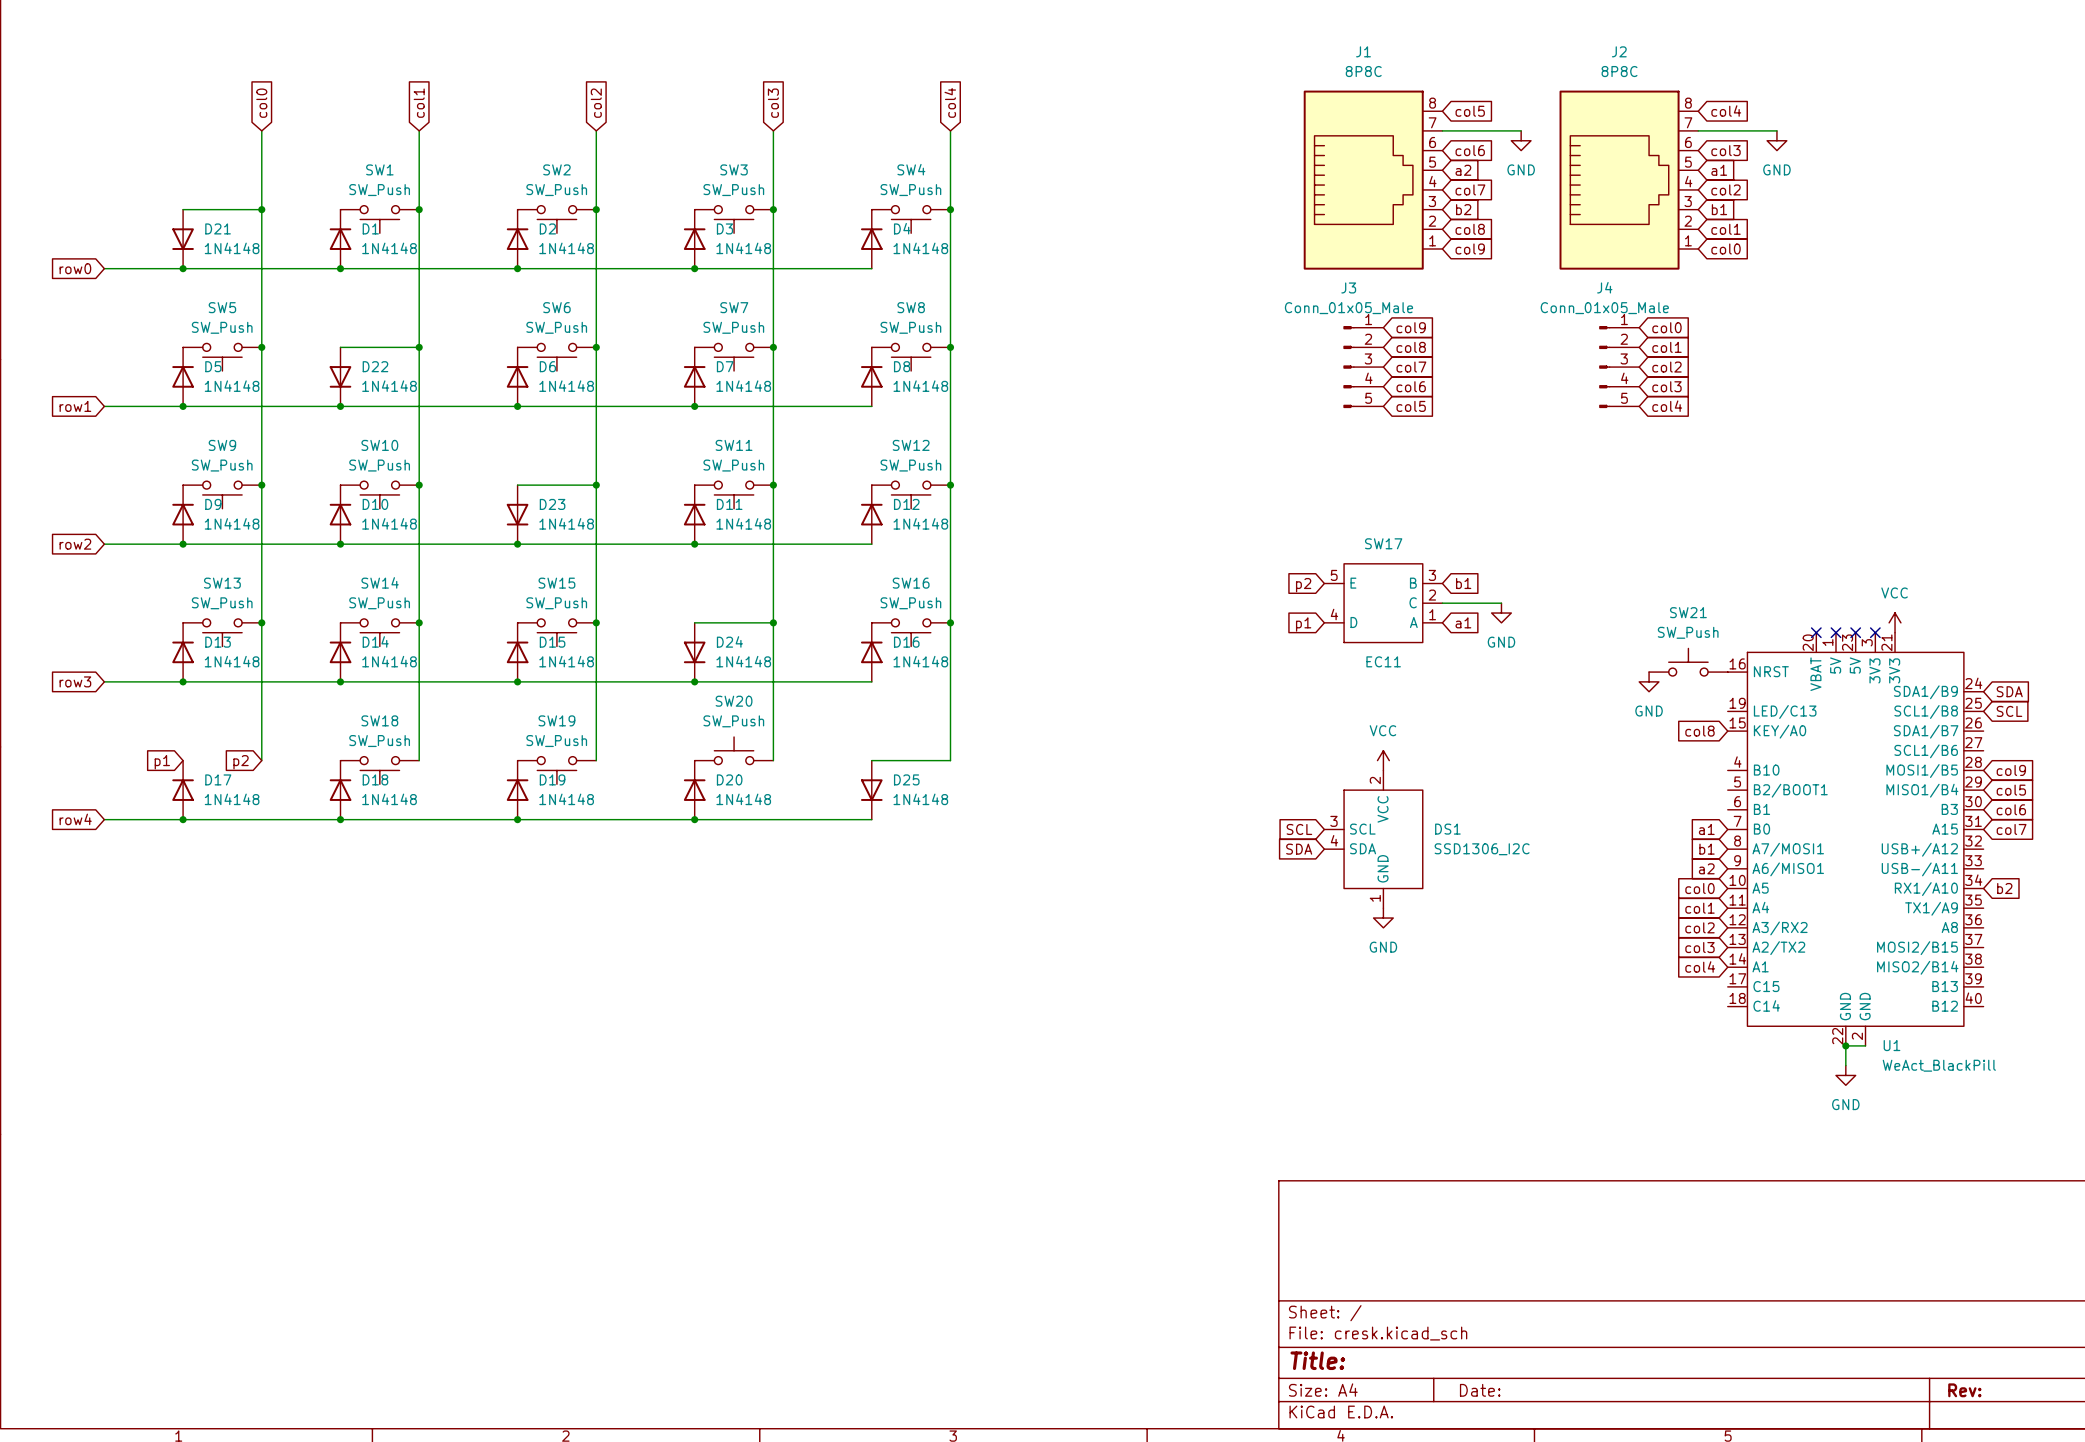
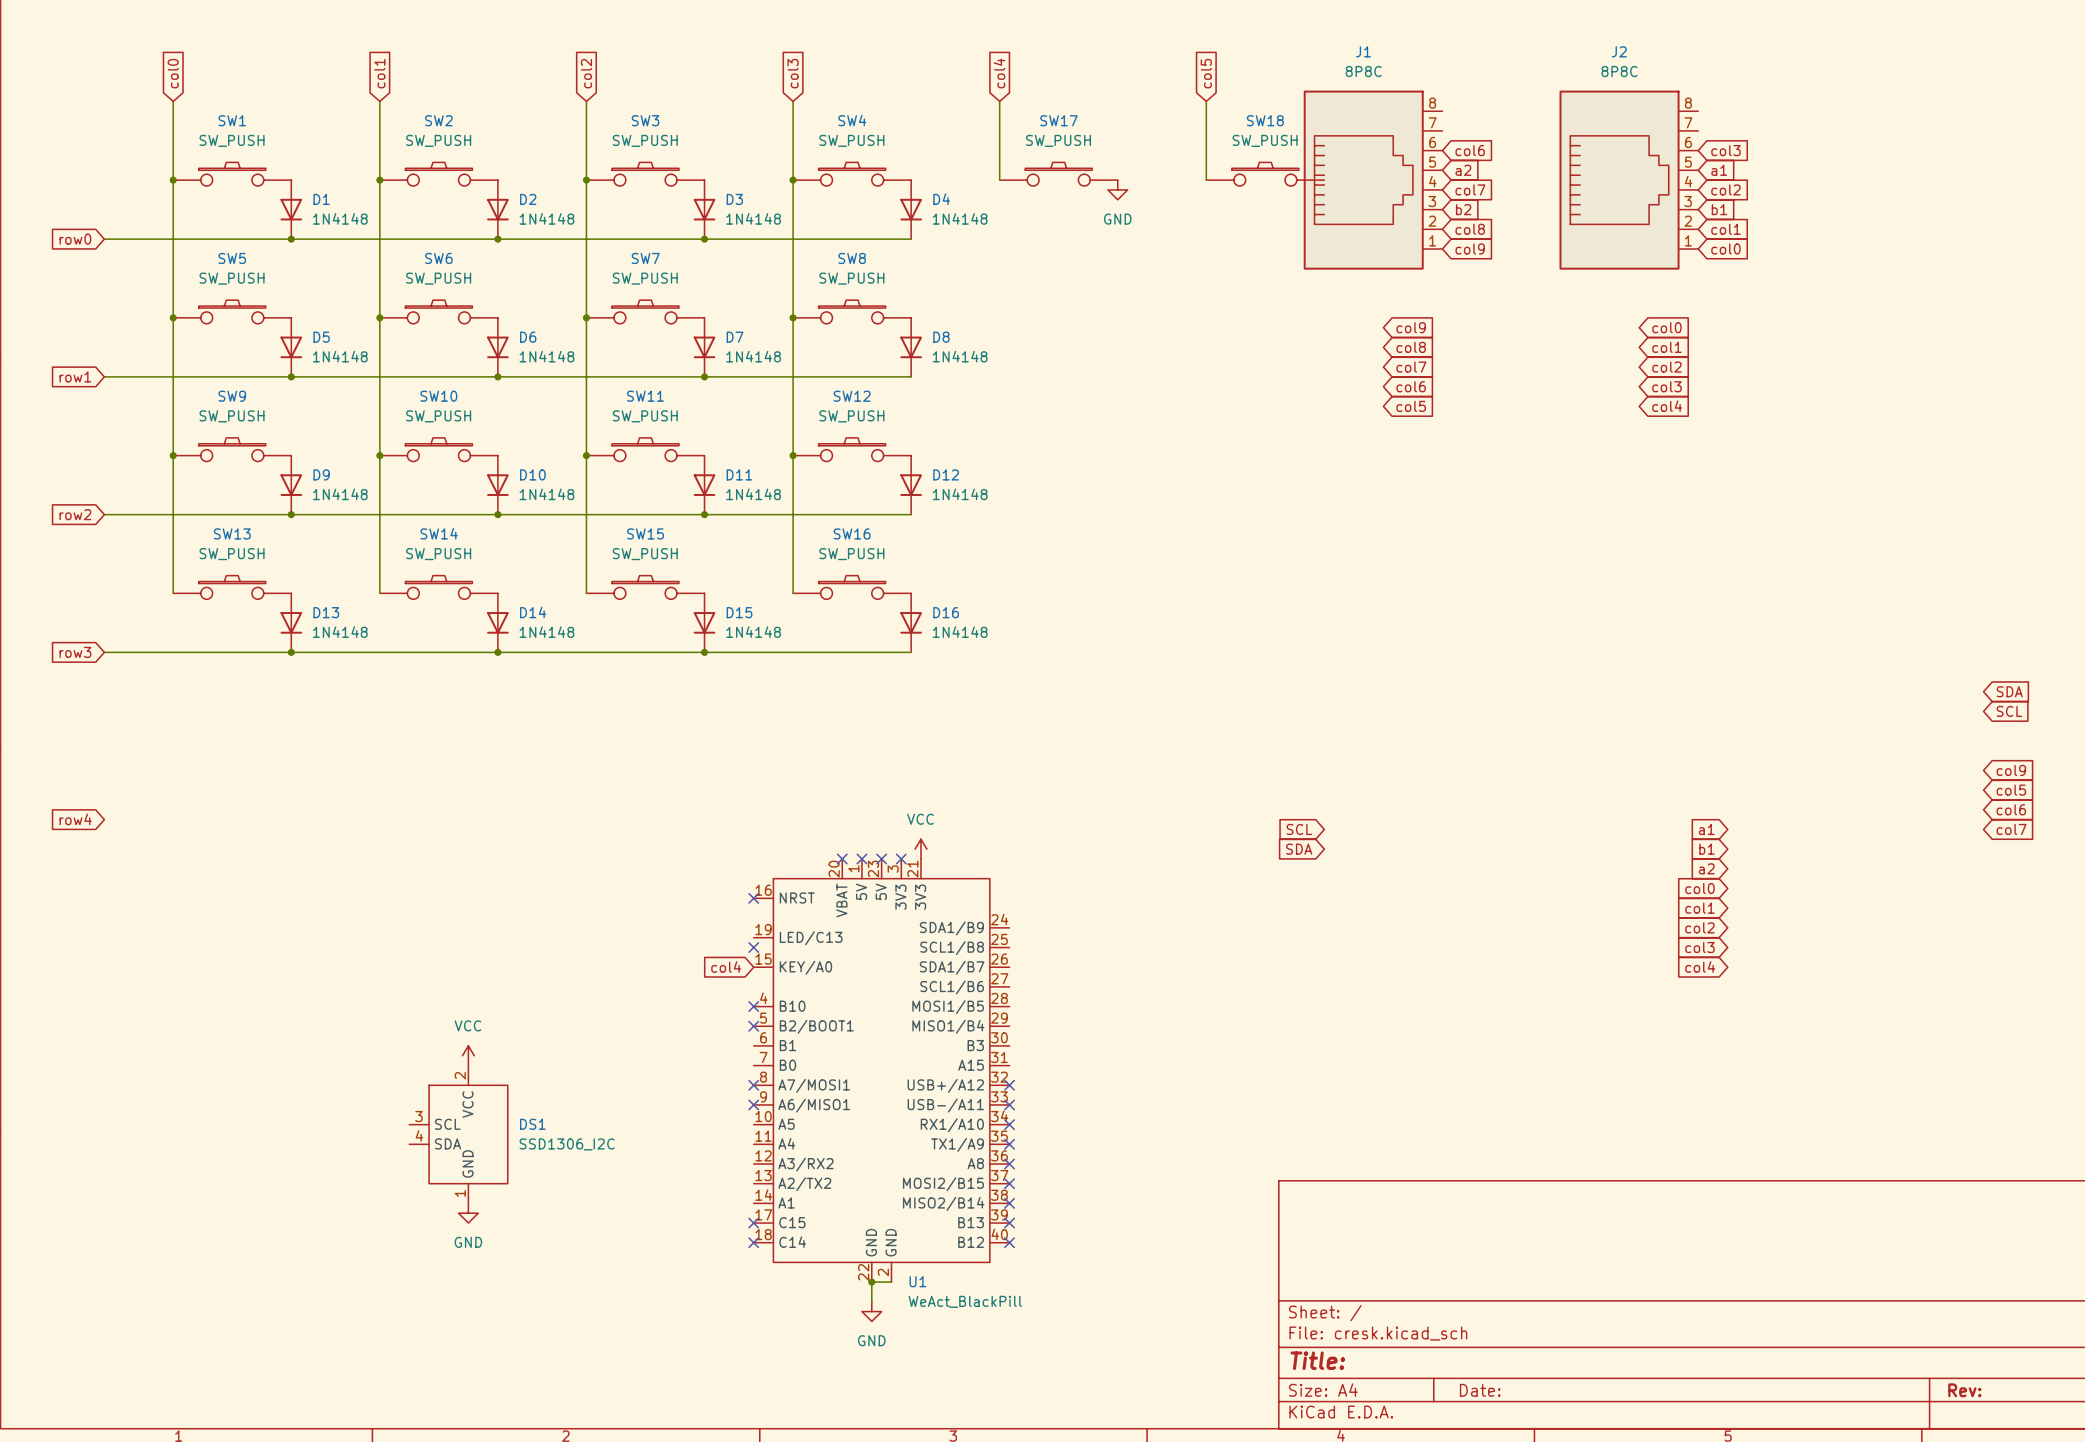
global label: none -> col5 (1206, 73)
wire: none -> (173, 101) (173, 593)
wire: none -> (379, 101) (379, 593)
wire: none -> (586, 101) (586, 593)
wire: none -> (793, 101) (793, 593)
wire: none -> (999, 101) (999, 180)
wire: none -> (1206, 101) (1206, 180)
global label position: col4 (950, 102) -> col4 (999, 73)
global label position: col0 (261, 103) -> col0 (173, 73)
global label position: col1 (419, 103) -> col1 (379, 73)
global label position: col2 (596, 103) -> col2 (586, 73)
global label position: col3 (773, 103) -> col3 (793, 73)
global label: col5 (1470, 111) -> none
global label: col4 (1726, 111) -> none
wire: (261, 130) (261, 760) -> none
wire: (419, 130) (419, 760) -> none
wire: (596, 130) (596, 760) -> none
wire: (773, 130) (773, 760) -> none
wire: (950, 130) (950, 760) (871, 760) -> none
wire: (1442, 130) (1521, 130) -> none
wire: (1698, 130) (1776, 130) -> none
power symbol: GND (1521, 140) -> none
power symbol: GND (1776, 140) -> none
junction: none -> (173, 180)
junction: none -> (379, 180)
power symbol: none -> GND (1117, 189)
SW1 value: SW_Push (379, 190) -> SW_PUSH (232, 140)
SW2 value: SW_Push (556, 190) -> SW_PUSH (438, 140)
SW3 value: SW_Push (733, 190) -> SW_PUSH (645, 140)
SW4 value: SW_Push (910, 190) -> SW_PUSH (851, 140)
SW1 symbol: [340, 205, 420, 234] -> [173, 162, 292, 187]
SW2 symbol: [517, 205, 597, 234] -> [379, 162, 498, 187]
SW3 symbol: [694, 205, 774, 234] -> [586, 162, 705, 187]
SW4 symbol: [871, 205, 951, 234] -> [793, 162, 912, 187]
wire: (183, 209) (261, 209) -> none
junction: (261, 209) -> none
junction: (419, 209) -> none
junction position: (596, 209) -> (586, 180)
junction position: (773, 209) -> (793, 180)
junction: (950, 209) -> none
wire: none -> (104, 239) (911, 239)
D21: 1N4148 (183, 239) -> none
junction: none -> (291, 239)
D1 rotation: 0° (340, 239) -> 180° (291, 209)
D1 position: (340, 239) -> (291, 209)
D2 rotation: 0° (517, 239) -> 180° (497, 209)
D2 position: (517, 239) -> (497, 209)
D3 rotation: 0° (694, 239) -> 180° (704, 209)
D4 rotation: 0° (871, 239) -> 180° (911, 209)
D4 position: (871, 239) -> (911, 209)
global label position: row0 (75, 268) -> row0 (75, 239)
wire: (104, 268) (871, 268) -> none
junction: (183, 268) -> none
junction: (340, 268) -> none
junction position: (517, 268) -> (497, 239)
junction position: (694, 268) -> (704, 239)
junction: none -> (173, 317)
junction: none -> (379, 317)
SW5 value: SW_Push (222, 327) -> SW_PUSH (232, 278)
SW6 value: SW_Push (556, 327) -> SW_PUSH (438, 278)
SW7 value: SW_Push (733, 327) -> SW_PUSH (645, 278)
SW8 value: SW_Push (910, 327) -> SW_PUSH (851, 278)
SW5 symbol: [183, 343, 262, 371] -> [173, 300, 292, 324]
SW6 symbol: [517, 343, 597, 371] -> [379, 300, 498, 324]
SW7 symbol: [694, 343, 774, 371] -> [586, 300, 705, 324]
SW8 symbol: [871, 343, 951, 371] -> [793, 300, 912, 324]
junction: (261, 347) -> none
wire: (340, 347) (419, 347) -> none
junction: (419, 347) -> none
junction position: (596, 347) -> (586, 317)
junction position: (773, 347) -> (793, 317)
junction: (950, 347) -> none
J3: Conn_01x05_Male (1363, 367) -> none
J4: Conn_01x05_Male (1619, 367) -> none
wire: none -> (104, 376) (911, 376)
D5 rotation: 0° (183, 376) -> 180° (291, 347)
D5 position: (183, 376) -> (291, 347)
junction: none -> (291, 376)
D22: 1N4148 (340, 376) -> none
D6 rotation: 0° (517, 376) -> 180° (497, 347)
D6 position: (517, 376) -> (497, 347)
D7 rotation: 0° (694, 376) -> 180° (704, 347)
D8 rotation: 0° (871, 376) -> 180° (911, 347)
D8 position: (871, 376) -> (911, 347)
global label position: row1 (75, 406) -> row1 (75, 376)
wire: (104, 406) (871, 406) -> none
junction: (183, 406) -> none
junction: (340, 406) -> none
junction position: (517, 406) -> (497, 376)
junction position: (694, 406) -> (704, 376)
junction: none -> (173, 455)
junction: none -> (379, 455)
SW9 value: SW_Push (222, 465) -> SW_PUSH (232, 416)
SW10 value: SW_Push (379, 465) -> SW_PUSH (438, 416)
SW11 value: SW_Push (733, 465) -> SW_PUSH (645, 416)
SW12 value: SW_Push (910, 465) -> SW_PUSH (851, 416)
SW9 symbol: [183, 481, 262, 509] -> [173, 437, 292, 462]
SW10 symbol: [340, 481, 420, 509] -> [379, 437, 498, 462]
SW11 symbol: [694, 481, 774, 509] -> [586, 437, 705, 462]
SW12 symbol: [871, 481, 951, 509] -> [793, 437, 912, 462]
junction: (261, 485) -> none
junction: (419, 485) -> none
wire: (517, 485) (596, 485) -> none
junction position: (596, 485) -> (586, 455)
junction position: (773, 485) -> (793, 455)
junction: (950, 485) -> none
wire: none -> (104, 514) (911, 514)
D9 rotation: 0° (183, 514) -> 180° (291, 485)
D9 position: (183, 514) -> (291, 485)
junction: none -> (291, 514)
D10 rotation: 0° (340, 514) -> 180° (497, 485)
D10 position: (340, 514) -> (497, 485)
D23: 1N4148 (517, 514) -> none
D11 rotation: 0° (694, 514) -> 180° (704, 485)
D12 rotation: 0° (871, 514) -> 180° (911, 485)
D12 position: (871, 514) -> (911, 485)
global label position: row2 (75, 544) -> row2 (75, 514)
wire: (104, 544) (871, 544) -> none
junction: (183, 544) -> none
junction: (340, 544) -> none
junction position: (517, 544) -> (497, 514)
junction position: (694, 544) -> (704, 514)
SW17 symbol: [1324, 563, 1443, 643] -> [999, 162, 1118, 187]
global label: b1 (1463, 583) -> none
global label: p2 (1303, 585) -> none
SW13 value: SW_Push (222, 603) -> SW_PUSH (232, 554)
SW14 value: SW_Push (379, 603) -> SW_PUSH (438, 554)
SW15 value: SW_Push (556, 603) -> SW_PUSH (645, 554)
SW16 value: SW_Push (910, 603) -> SW_PUSH (851, 554)
wire: (1442, 603) (1501, 603) -> none
power symbol: GND (1501, 613) -> none
SW13 symbol: [183, 618, 262, 647] -> [173, 575, 292, 600]
SW14 symbol: [340, 618, 420, 647] -> [379, 575, 498, 600]
SW15 symbol: [517, 618, 597, 647] -> [586, 575, 705, 600]
SW16 symbol: [871, 618, 951, 647] -> [793, 575, 912, 600]
junction: (261, 622) -> none
junction: (419, 622) -> none
junction: (596, 622) -> none
wire: (694, 622) (773, 622) -> none
junction: (773, 622) -> none
junction: (950, 622) -> none
global label: a1 (1463, 622) -> none
power symbol: VCC (1895, 622) -> none
global label: p1 (1303, 624) -> none
U1 symbol: [1727, 632, 1984, 1046] -> [753, 858, 1010, 1283]
no-connect mark: (1816, 632) -> none
no-connect mark: (1835, 632) -> none
no-connect mark: (1855, 632) -> none
no-connect mark: (1875, 632) -> none
wire: none -> (104, 652) (911, 652)
D13 rotation: 0° (183, 652) -> 180° (291, 622)
D13 position: (183, 652) -> (291, 622)
junction: none -> (291, 652)
D14 rotation: 0° (340, 652) -> 180° (497, 622)
D14 position: (340, 652) -> (497, 622)
D15 rotation: 0° (517, 652) -> 180° (704, 622)
D15 position: (517, 652) -> (704, 622)
D24: 1N4148 (694, 652) -> none
D16 rotation: 0° (871, 652) -> 180° (911, 622)
D16 position: (871, 652) -> (911, 622)
SW17 value: EC11 (1383, 661) -> SW_PUSH (1058, 140)
SW21: SW_Push (1688, 662) -> none
global label position: row3 (75, 681) -> row3 (75, 652)
wire: (104, 681) (871, 681) -> none
junction: (183, 681) -> none
junction: (340, 681) -> none
junction position: (517, 681) -> (497, 652)
junction position: (694, 681) -> (704, 652)
power symbol: GND (1649, 681) -> none
global label: col8 (1699, 731) -> none
SW18 value: SW_Push (379, 741) -> SW_PUSH (1265, 140)
SW20: SW_Push (734, 750) -> none
SW18 symbol: [340, 756, 420, 785] -> [1206, 162, 1325, 187]
power symbol: VCC (1383, 760) -> none
global label: p1 (162, 762) -> none
global label: p2 (241, 762) -> none
SW19: SW_Push (556, 770) -> none
D17: 1N4148 (183, 790) -> none
D18: 1N4148 (340, 790) -> none
D19: 1N4148 (517, 790) -> none
D20: 1N4148 (694, 790) -> none
D25: 1N4148 (871, 790) -> none
wire: (104, 819) (871, 819) -> none
junction: (183, 819) -> none
junction: (340, 819) -> none
junction: (517, 819) -> none
junction: (694, 819) -> none
DS1 position: (1373, 839) -> (458, 1134)
power symbol: none -> VCC (920, 849)
no-connect mark: none -> (842, 858)
no-connect mark: none -> (861, 858)
no-connect mark: none -> (881, 858)
no-connect mark: none -> (901, 858)
global label: b2 (2004, 888) -> none
no-connect mark: none -> (753, 898)
power symbol: GND (1383, 918) -> none
no-connect mark: none -> (753, 947)
global label: none -> col4 (726, 966)
no-connect mark: none -> (753, 1006)
no-connect mark: none -> (753, 1026)
junction: (1845, 1045) -> none
wire: (1865, 1045) (1845, 1045) (1845, 1065) -> none
power symbol: none -> VCC (468, 1055)
power symbol: GND (1845, 1075) -> none
no-connect mark: none -> (753, 1085)
no-connect mark: none -> (1009, 1085)
no-connect mark: none -> (753, 1104)
no-connect mark: none -> (1009, 1104)
no-connect mark: none -> (1009, 1124)
no-connect mark: none -> (1009, 1144)
no-connect mark: none -> (1009, 1164)
no-connect mark: none -> (1009, 1183)
no-connect mark: none -> (1009, 1203)
power symbol: none -> GND (468, 1213)
no-connect mark: none -> (753, 1223)
no-connect mark: none -> (1009, 1223)
no-connect mark: none -> (753, 1242)
no-connect mark: none -> (1009, 1242)
junction: none -> (871, 1282)
wire: none -> (891, 1282) (871, 1282) (871, 1301)
power symbol: none -> GND (871, 1311)

